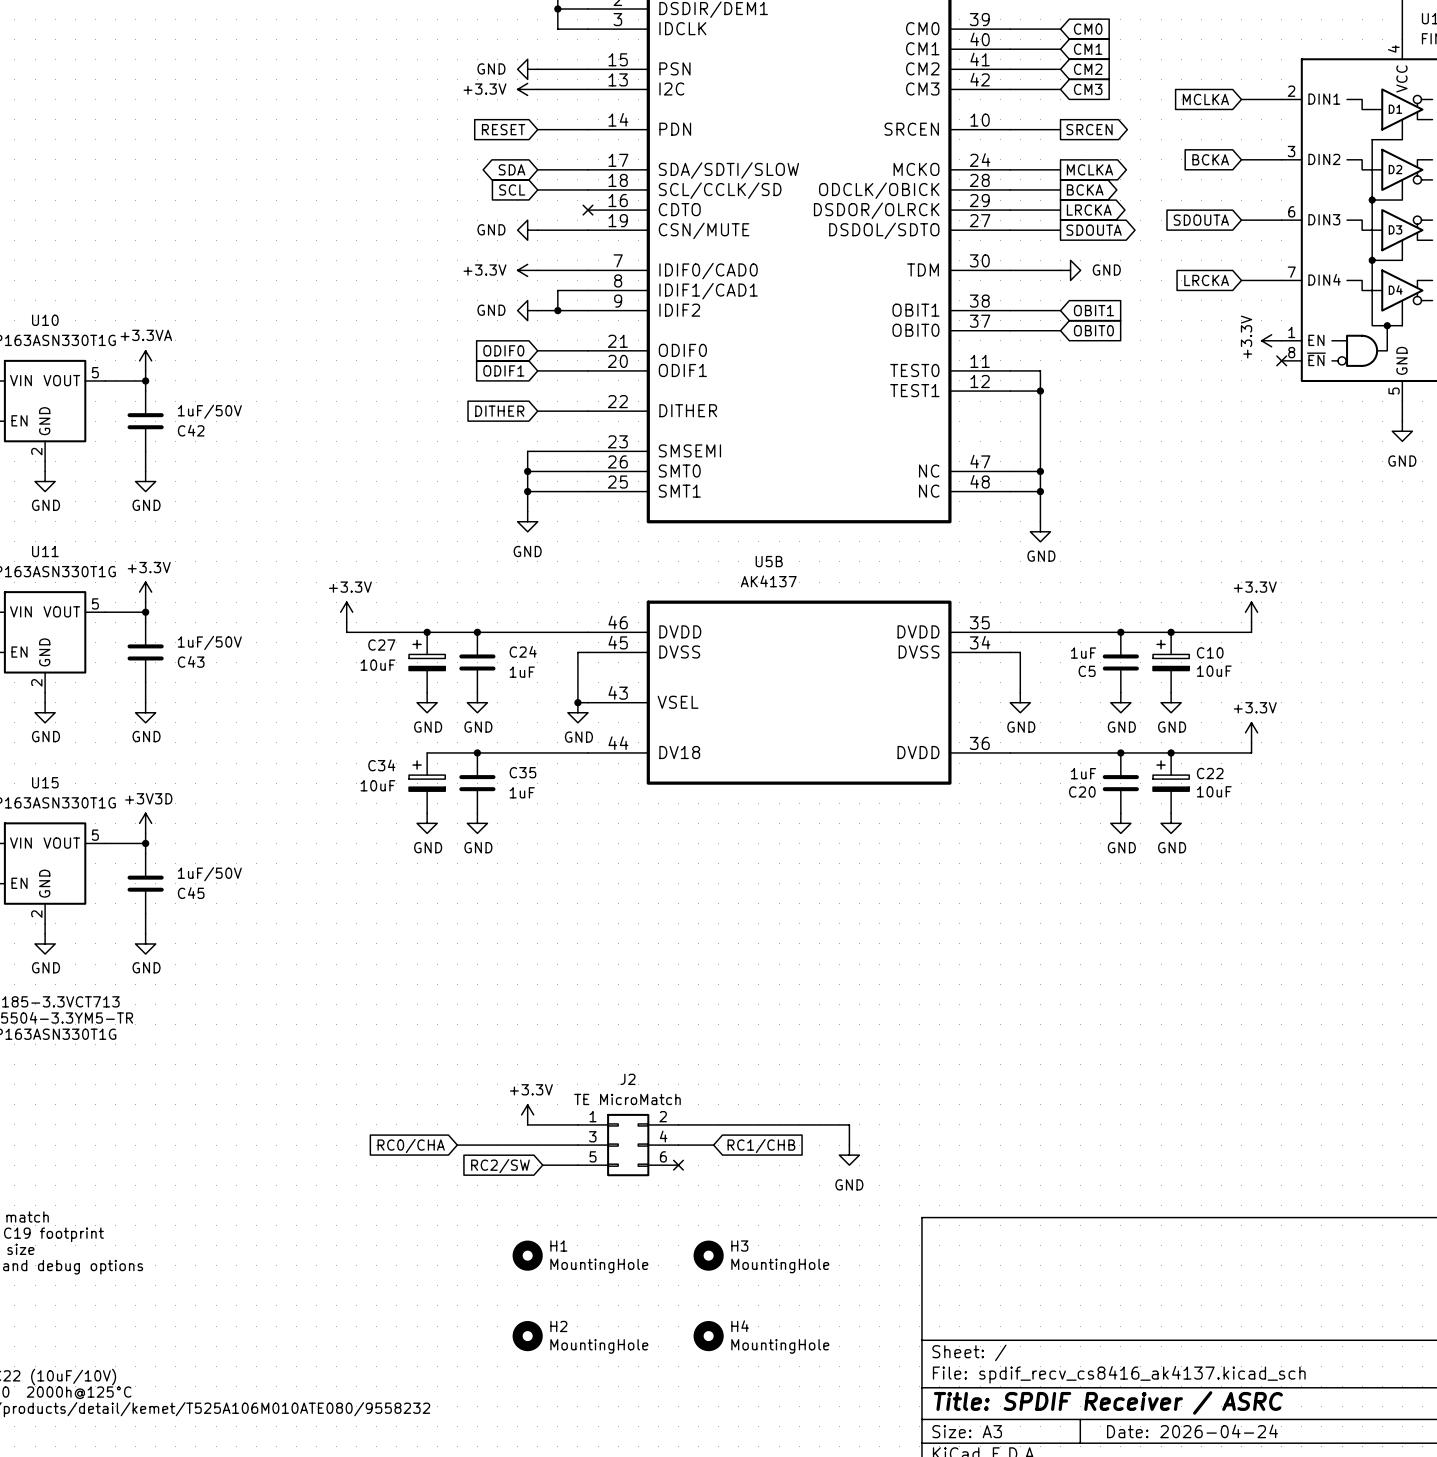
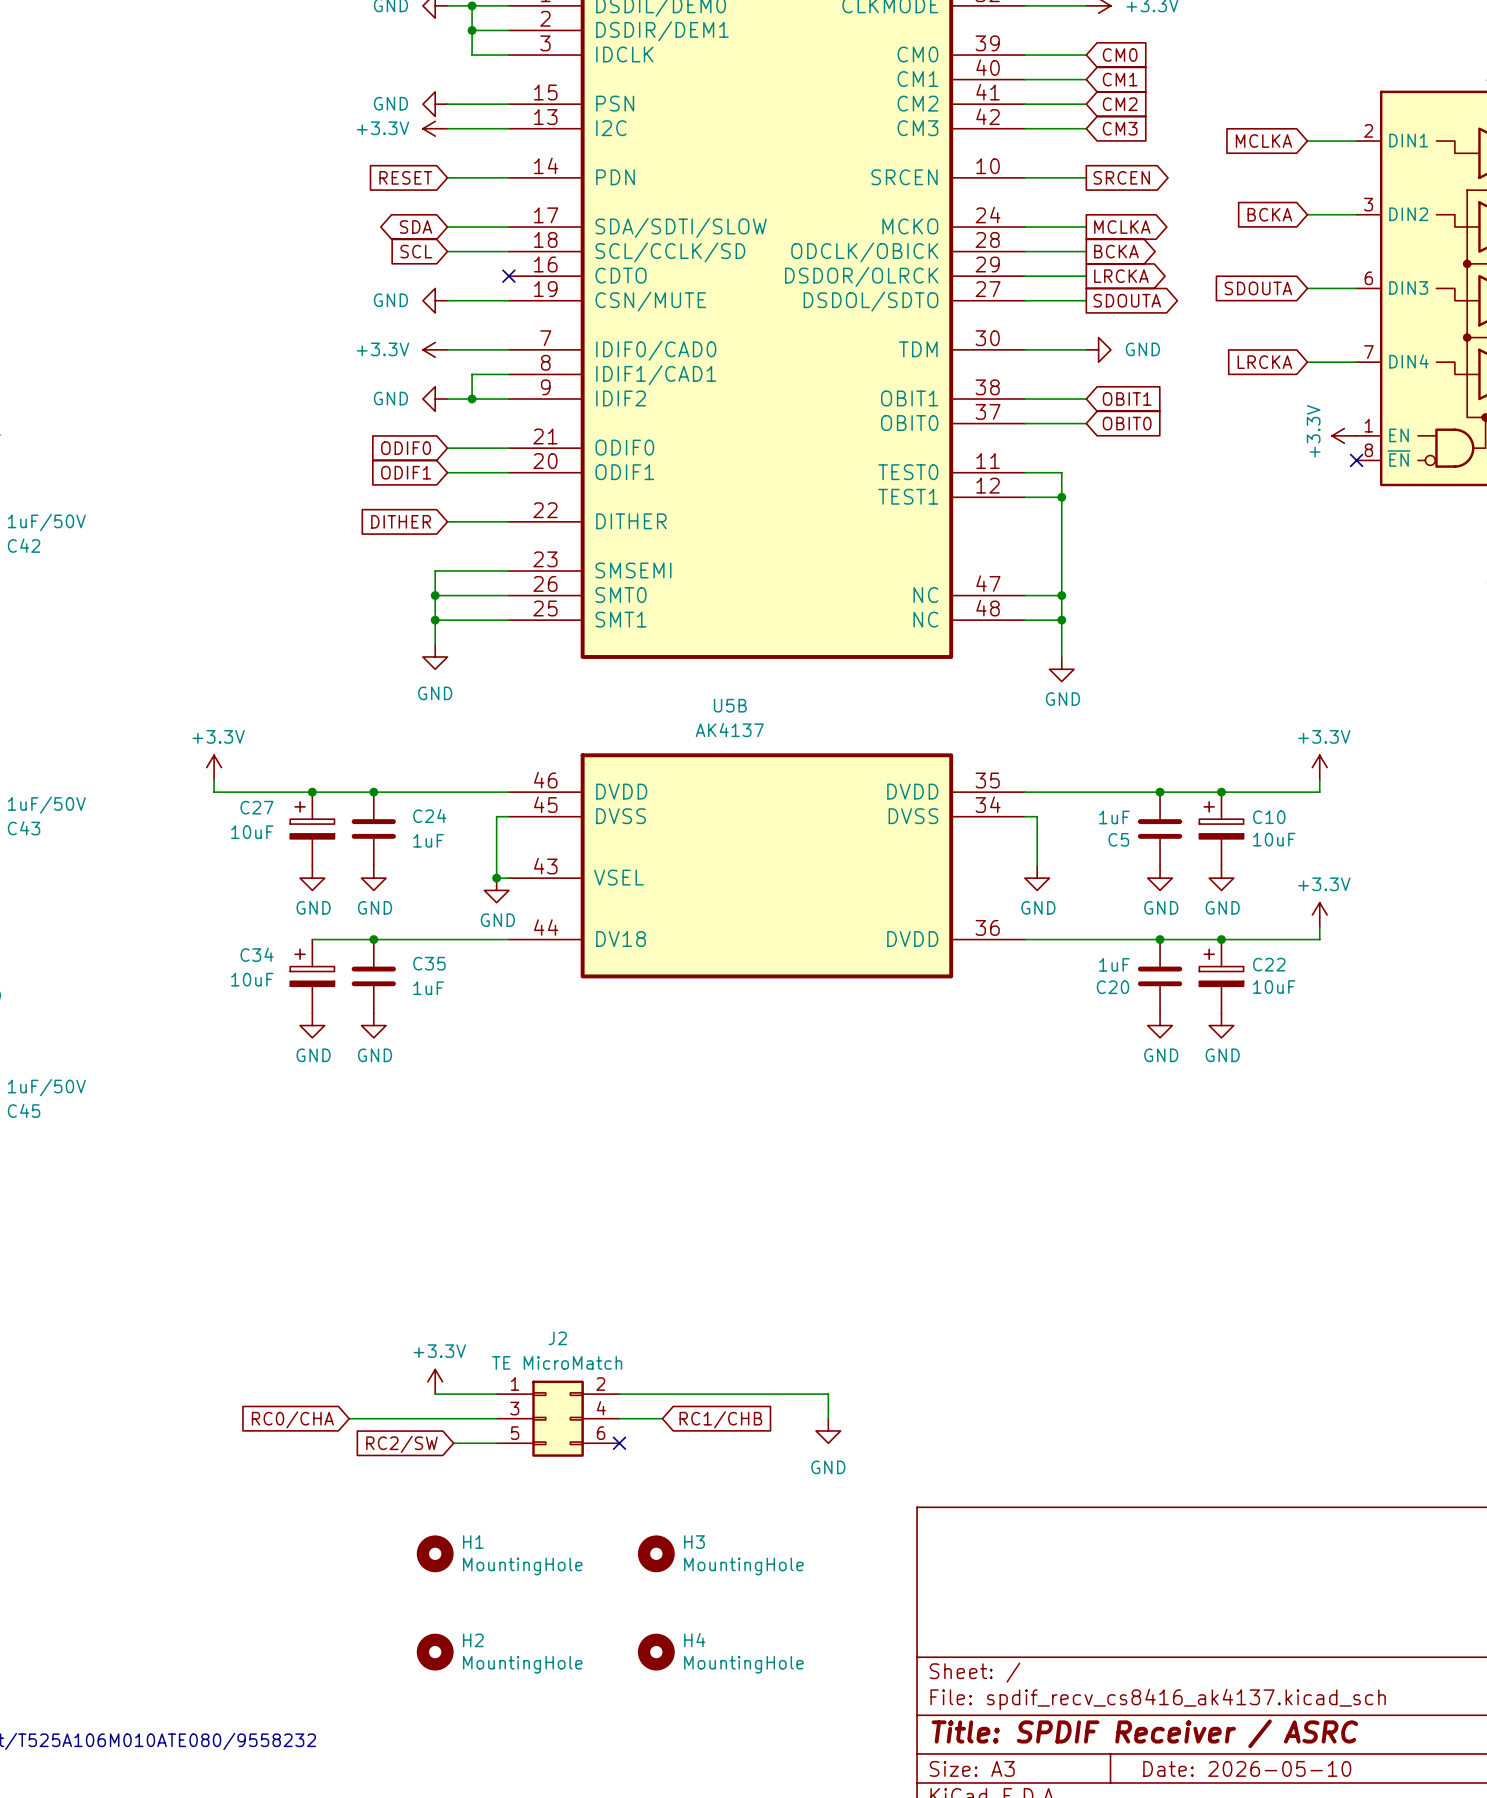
title block: Date: 2026-04-24 (1192, 1431) -> Date: 2026-05-10 (1247, 1768)

